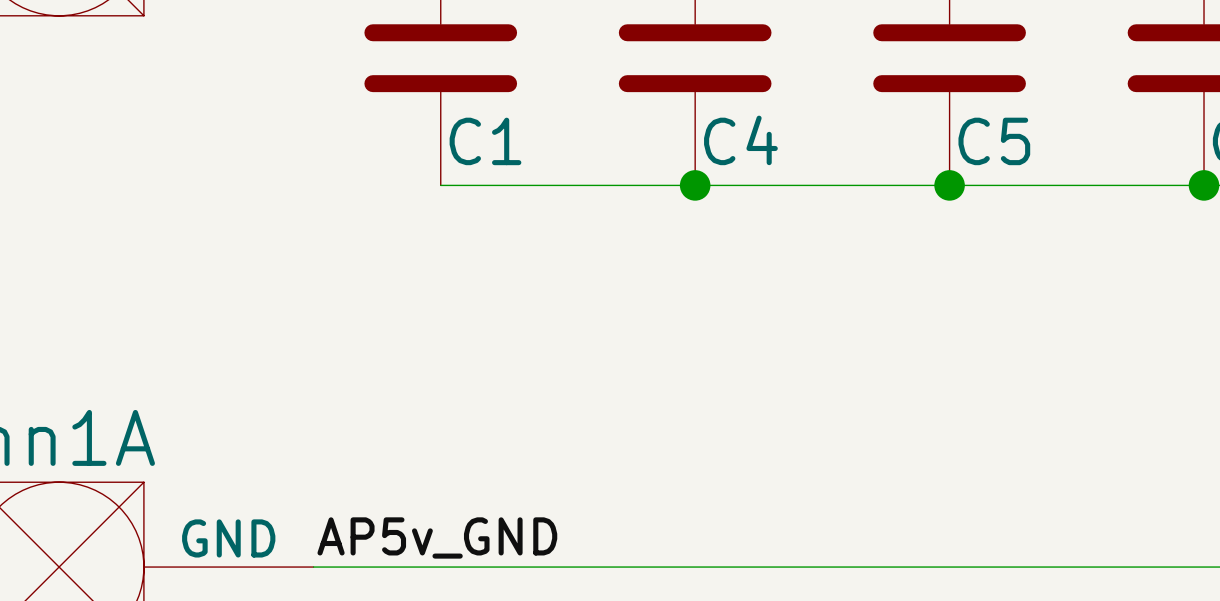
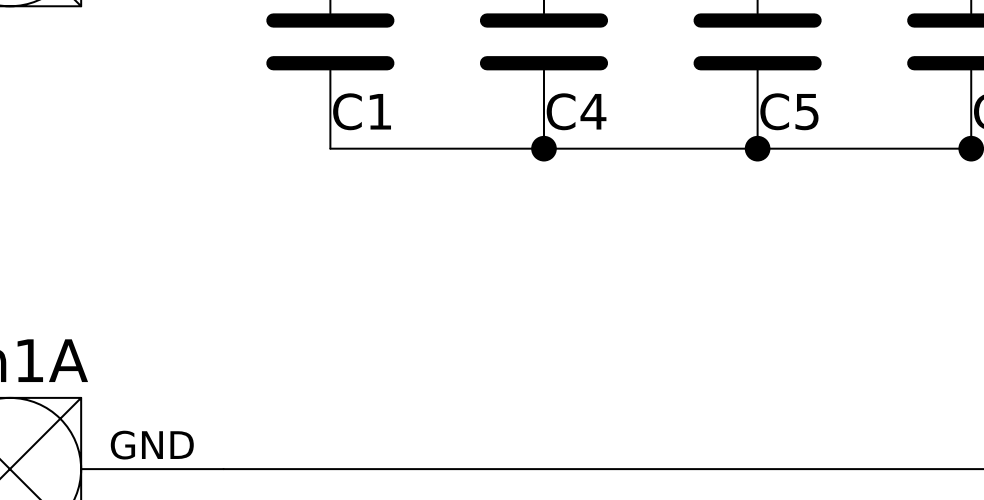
label: AP5v_GND (437, 537) -> none

